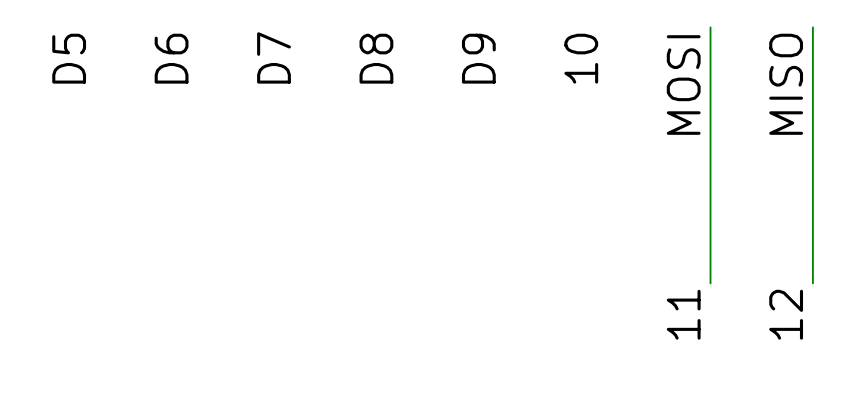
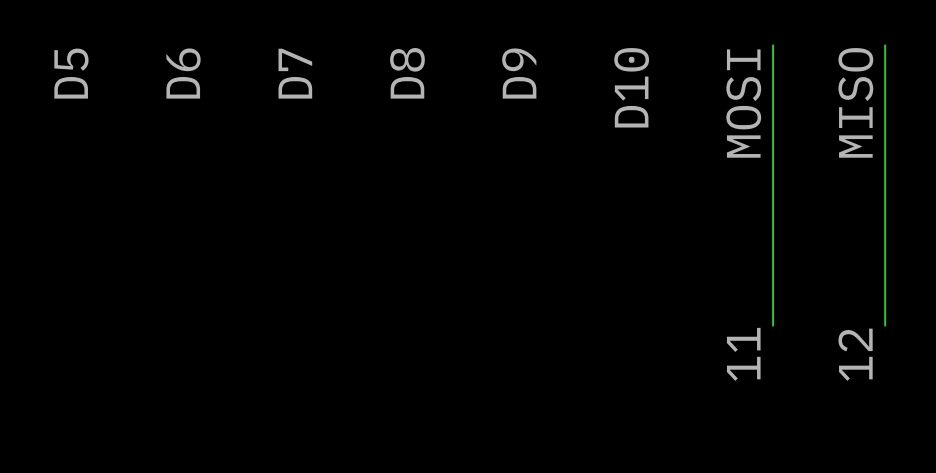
label: 10 (581, 58) -> D10 (631, 87)

